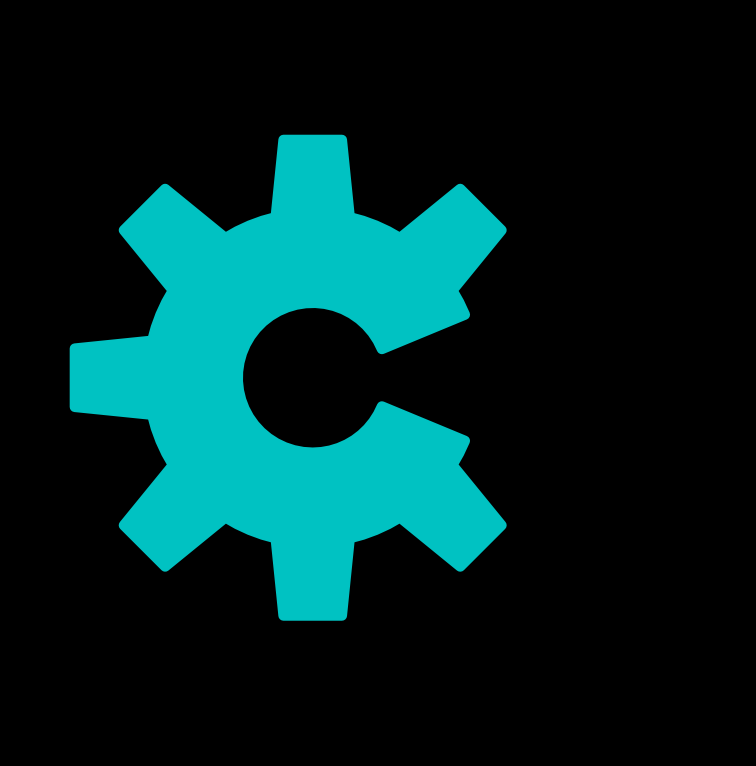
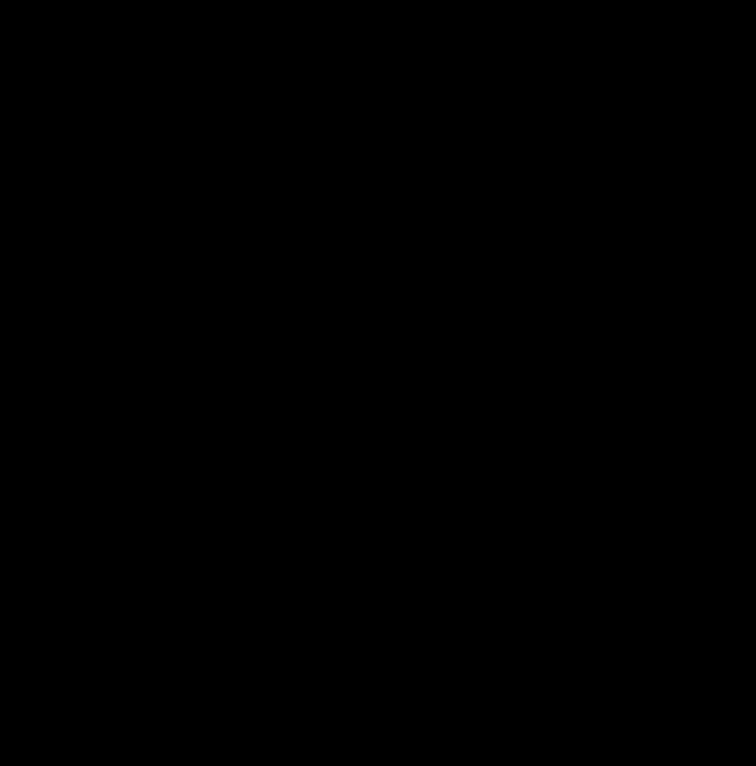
drawing: [69, 134, 507, 621] -> none

